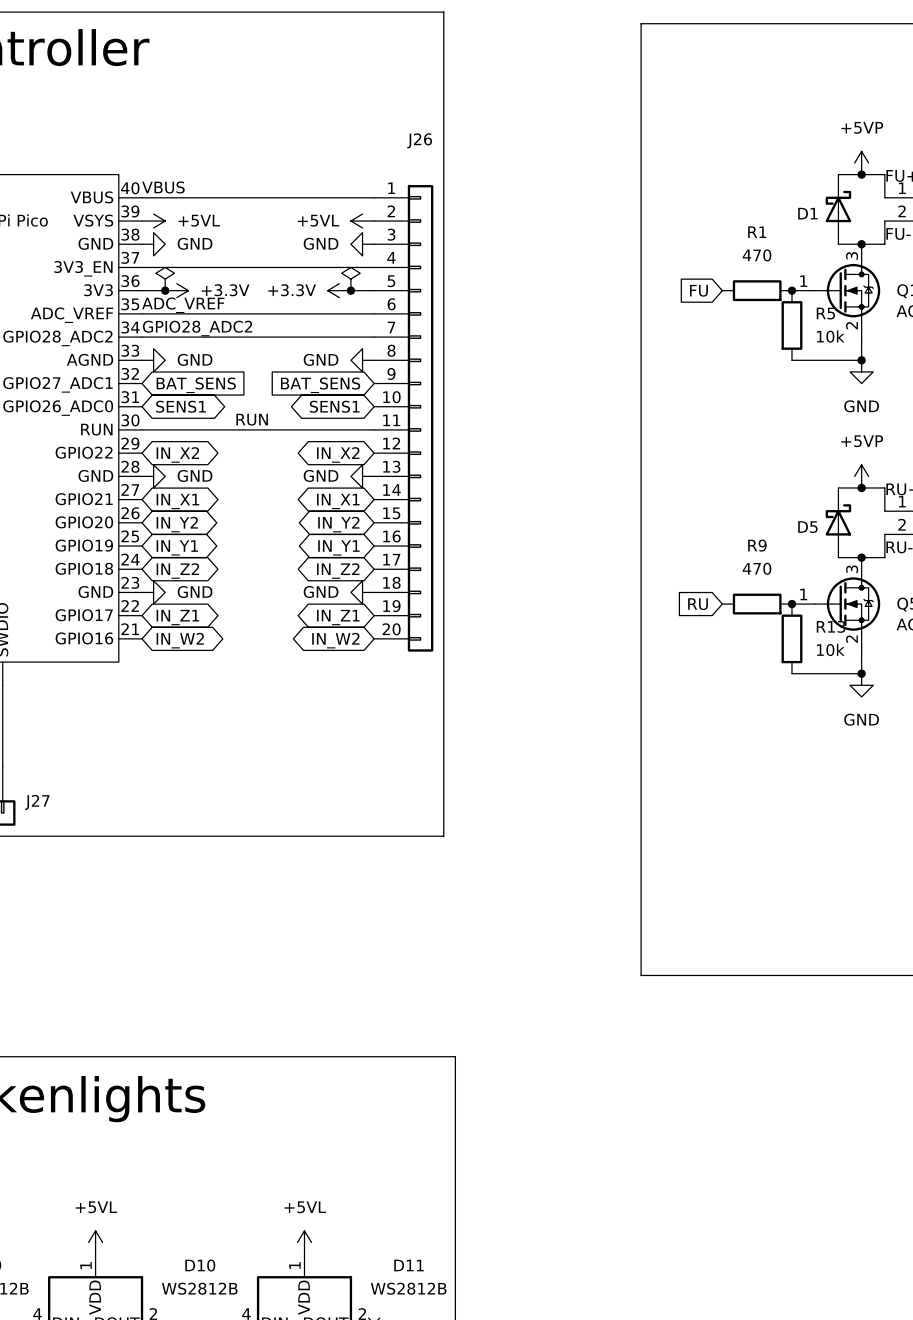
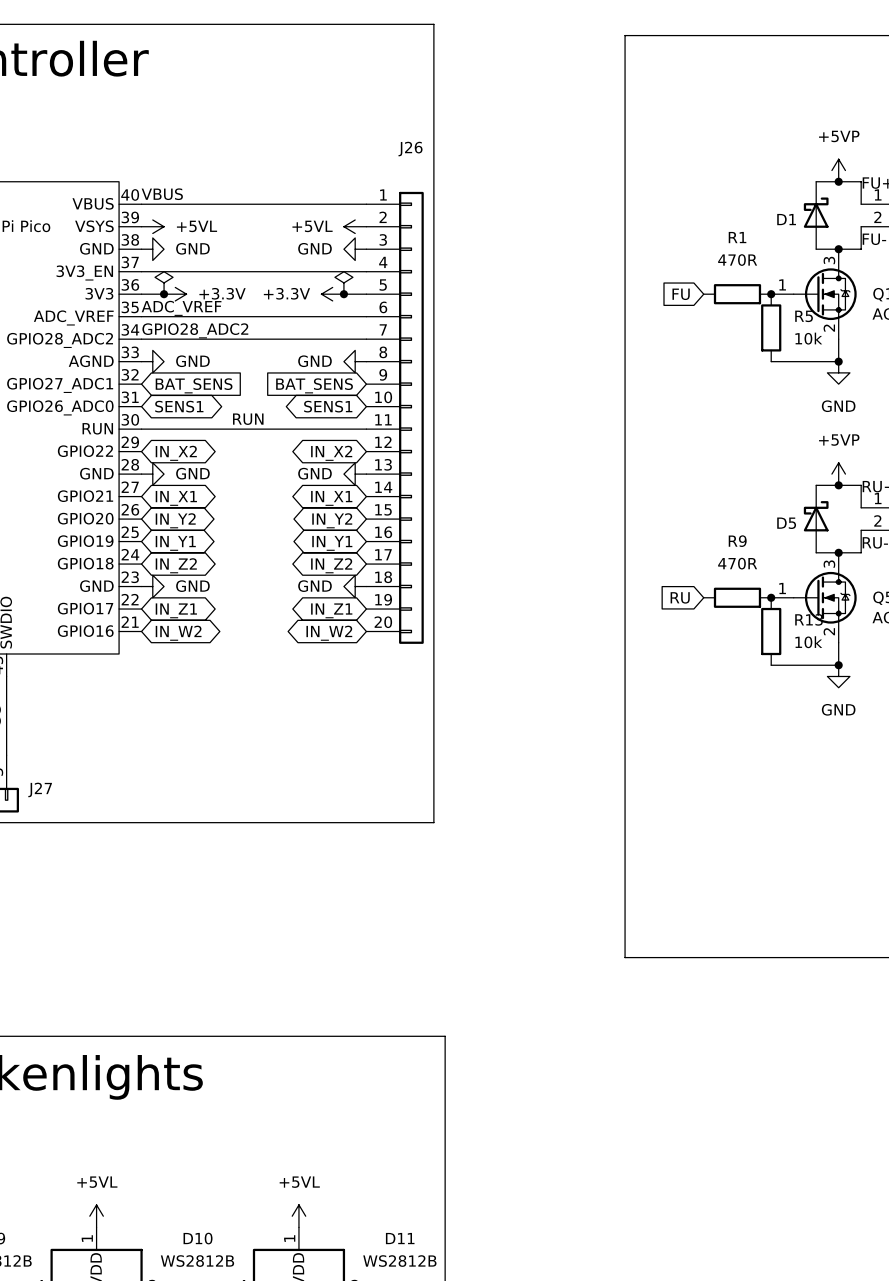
R1 value: 470 (757, 255) -> 470R (737, 260)
R9 value: 470 (757, 568) -> 470R (737, 563)

